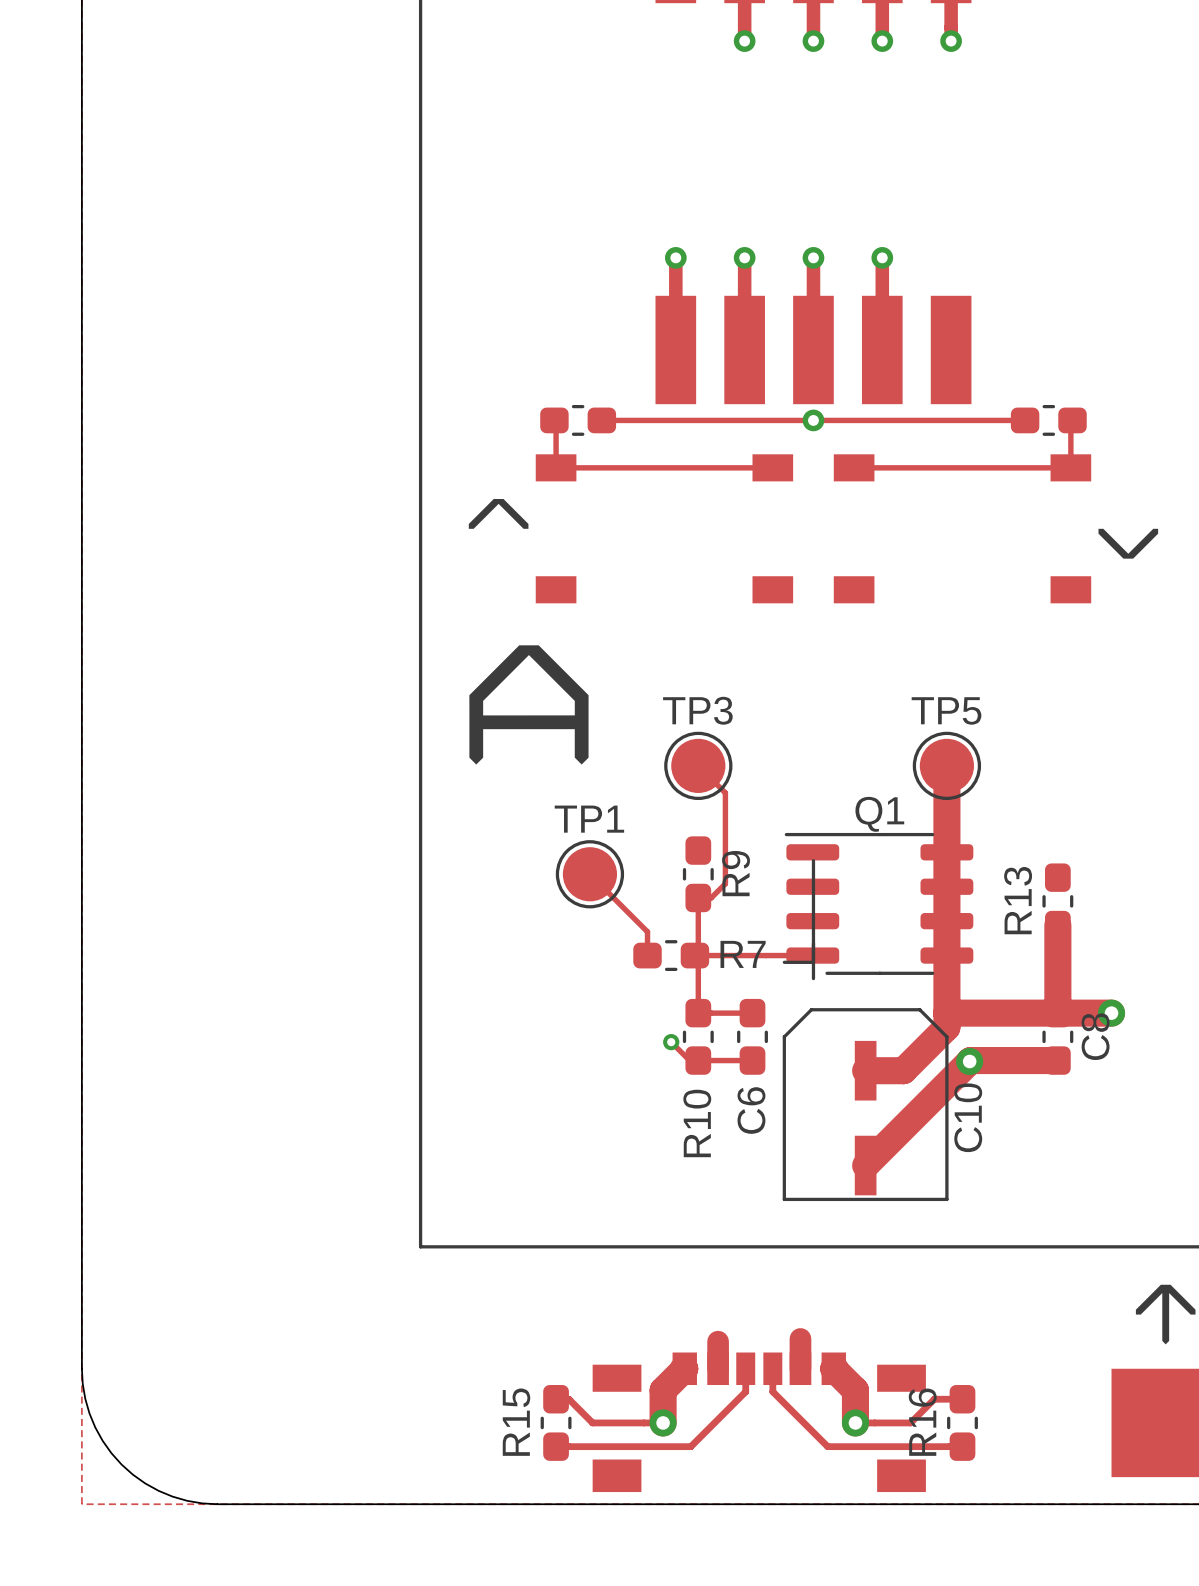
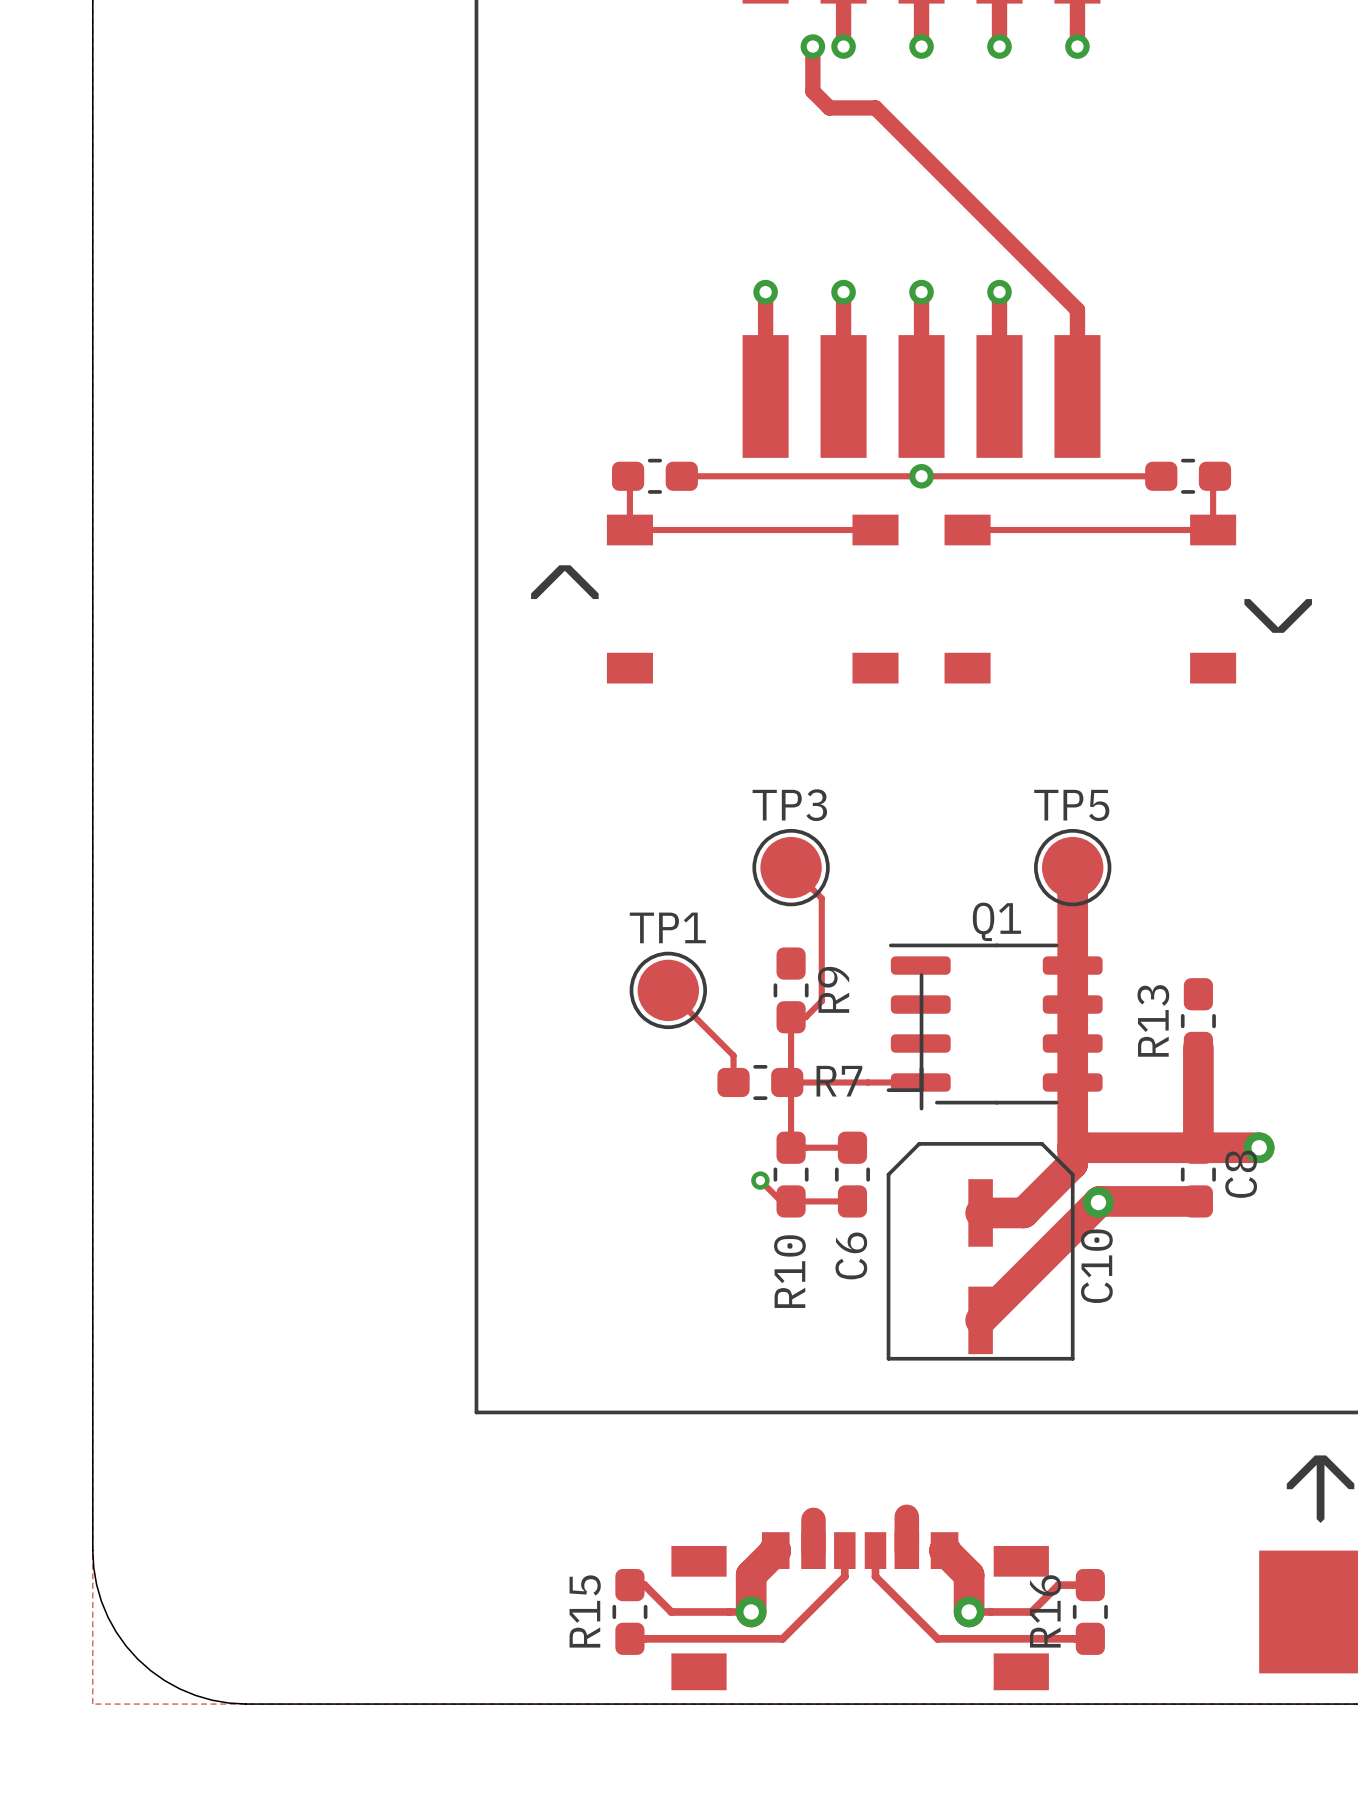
track: none -> (812, 46) (812, 91) (829, 107) (875, 107) (1077, 309) (1077, 396)
via: none -> (812, 46)
drawing: [469, 645, 589, 765] -> none

